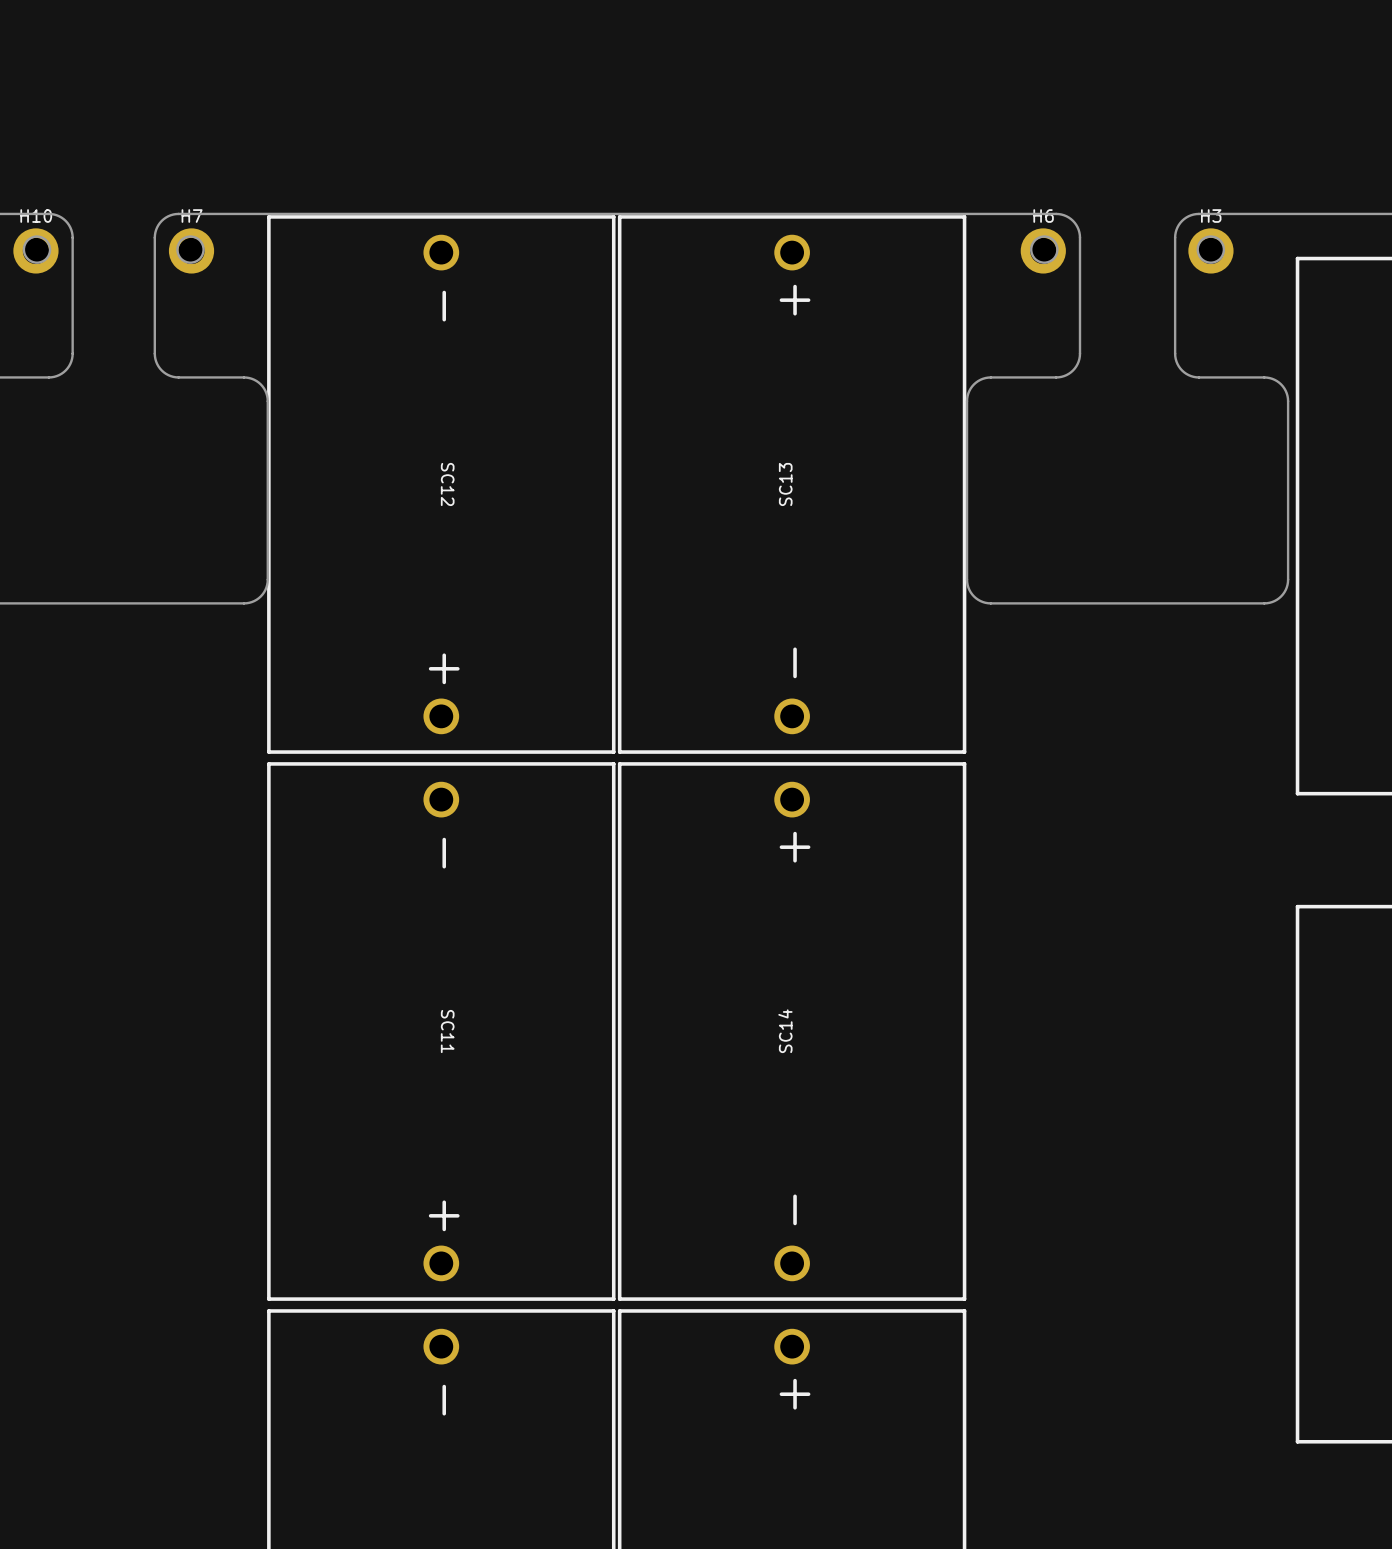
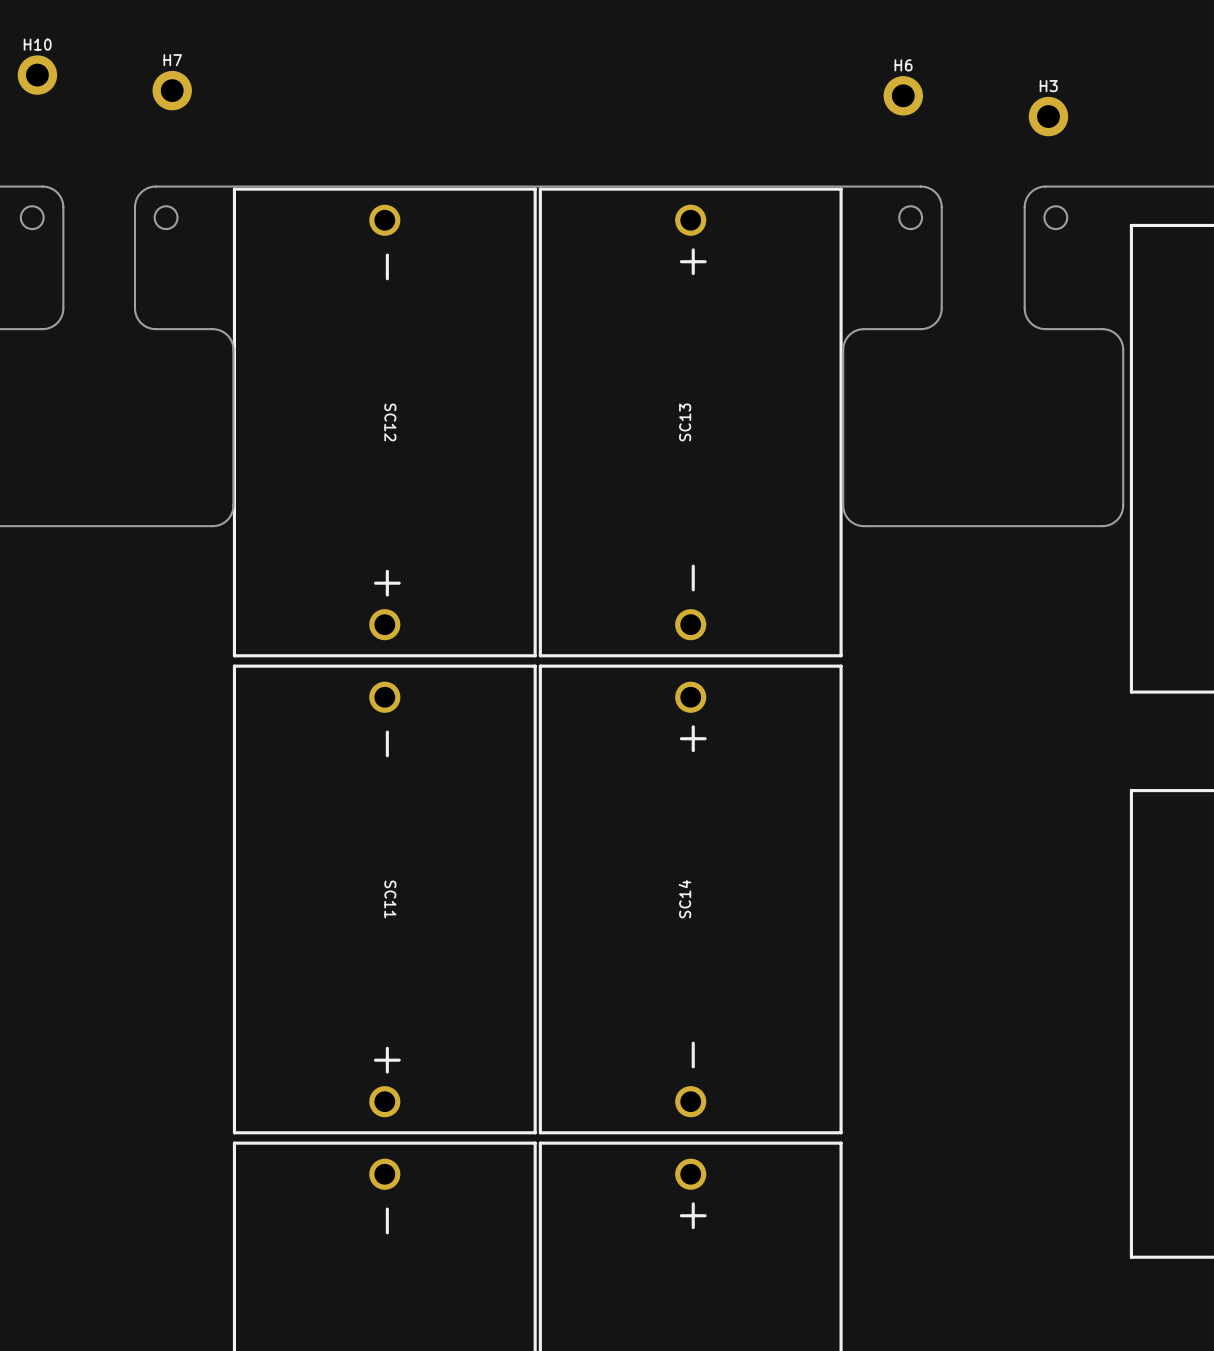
H10 position: (35, 250) -> (37, 75)
H7 position: (191, 250) -> (172, 90)
H6 position: (1043, 250) -> (903, 95)
H3 position: (1210, 250) -> (1048, 116)

